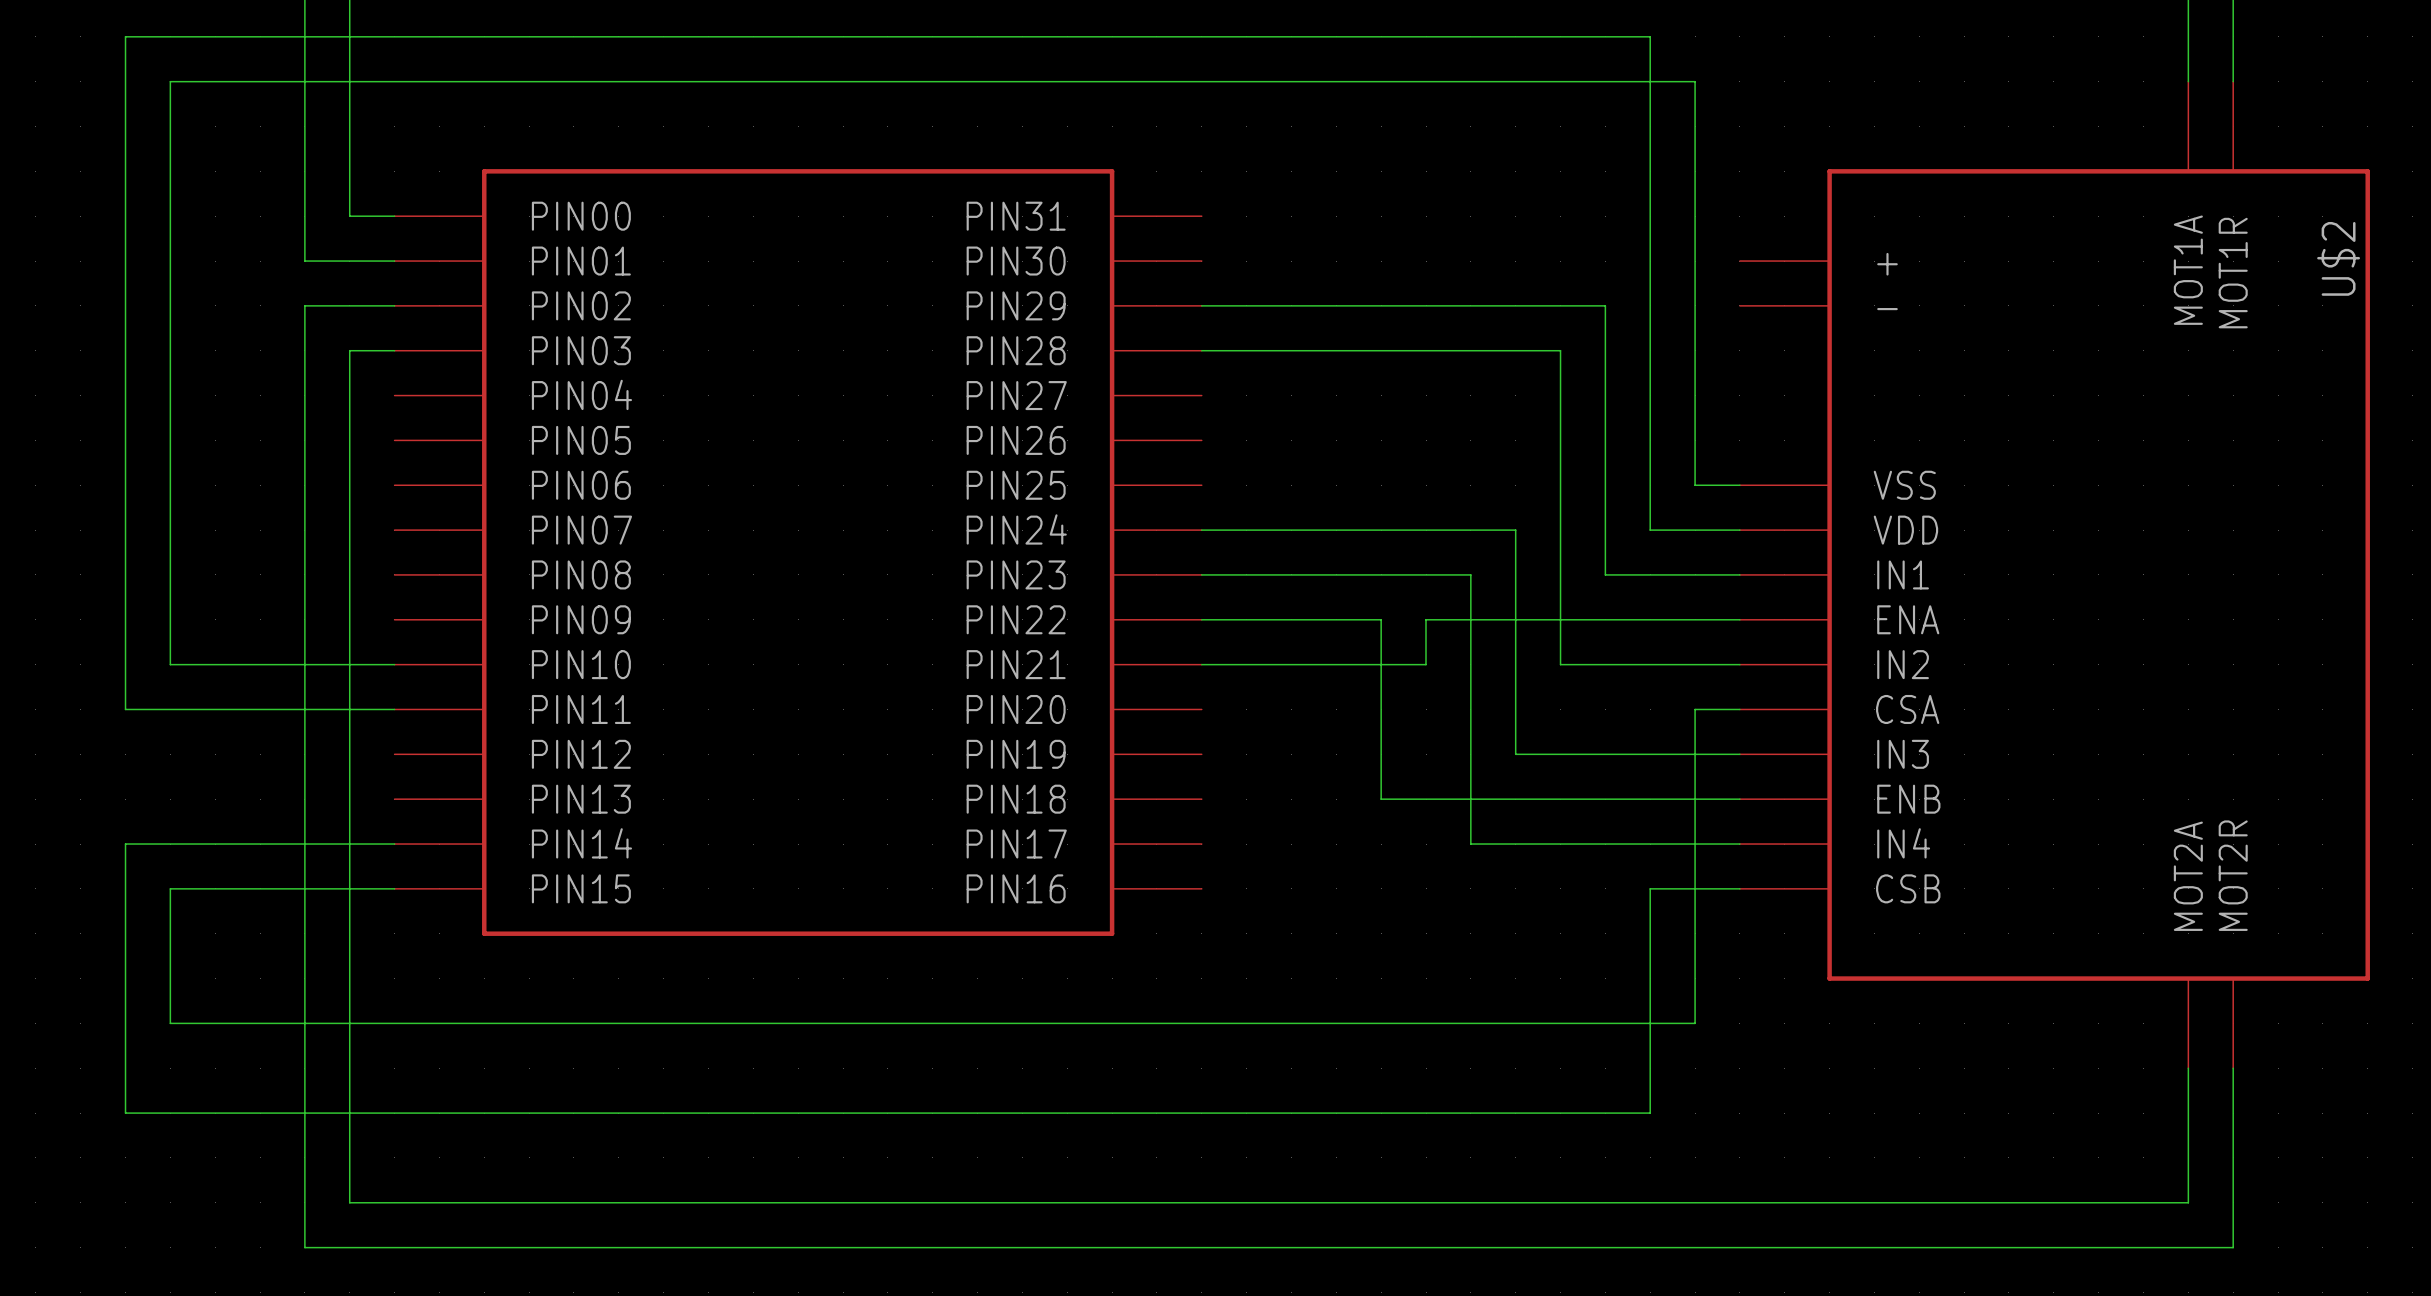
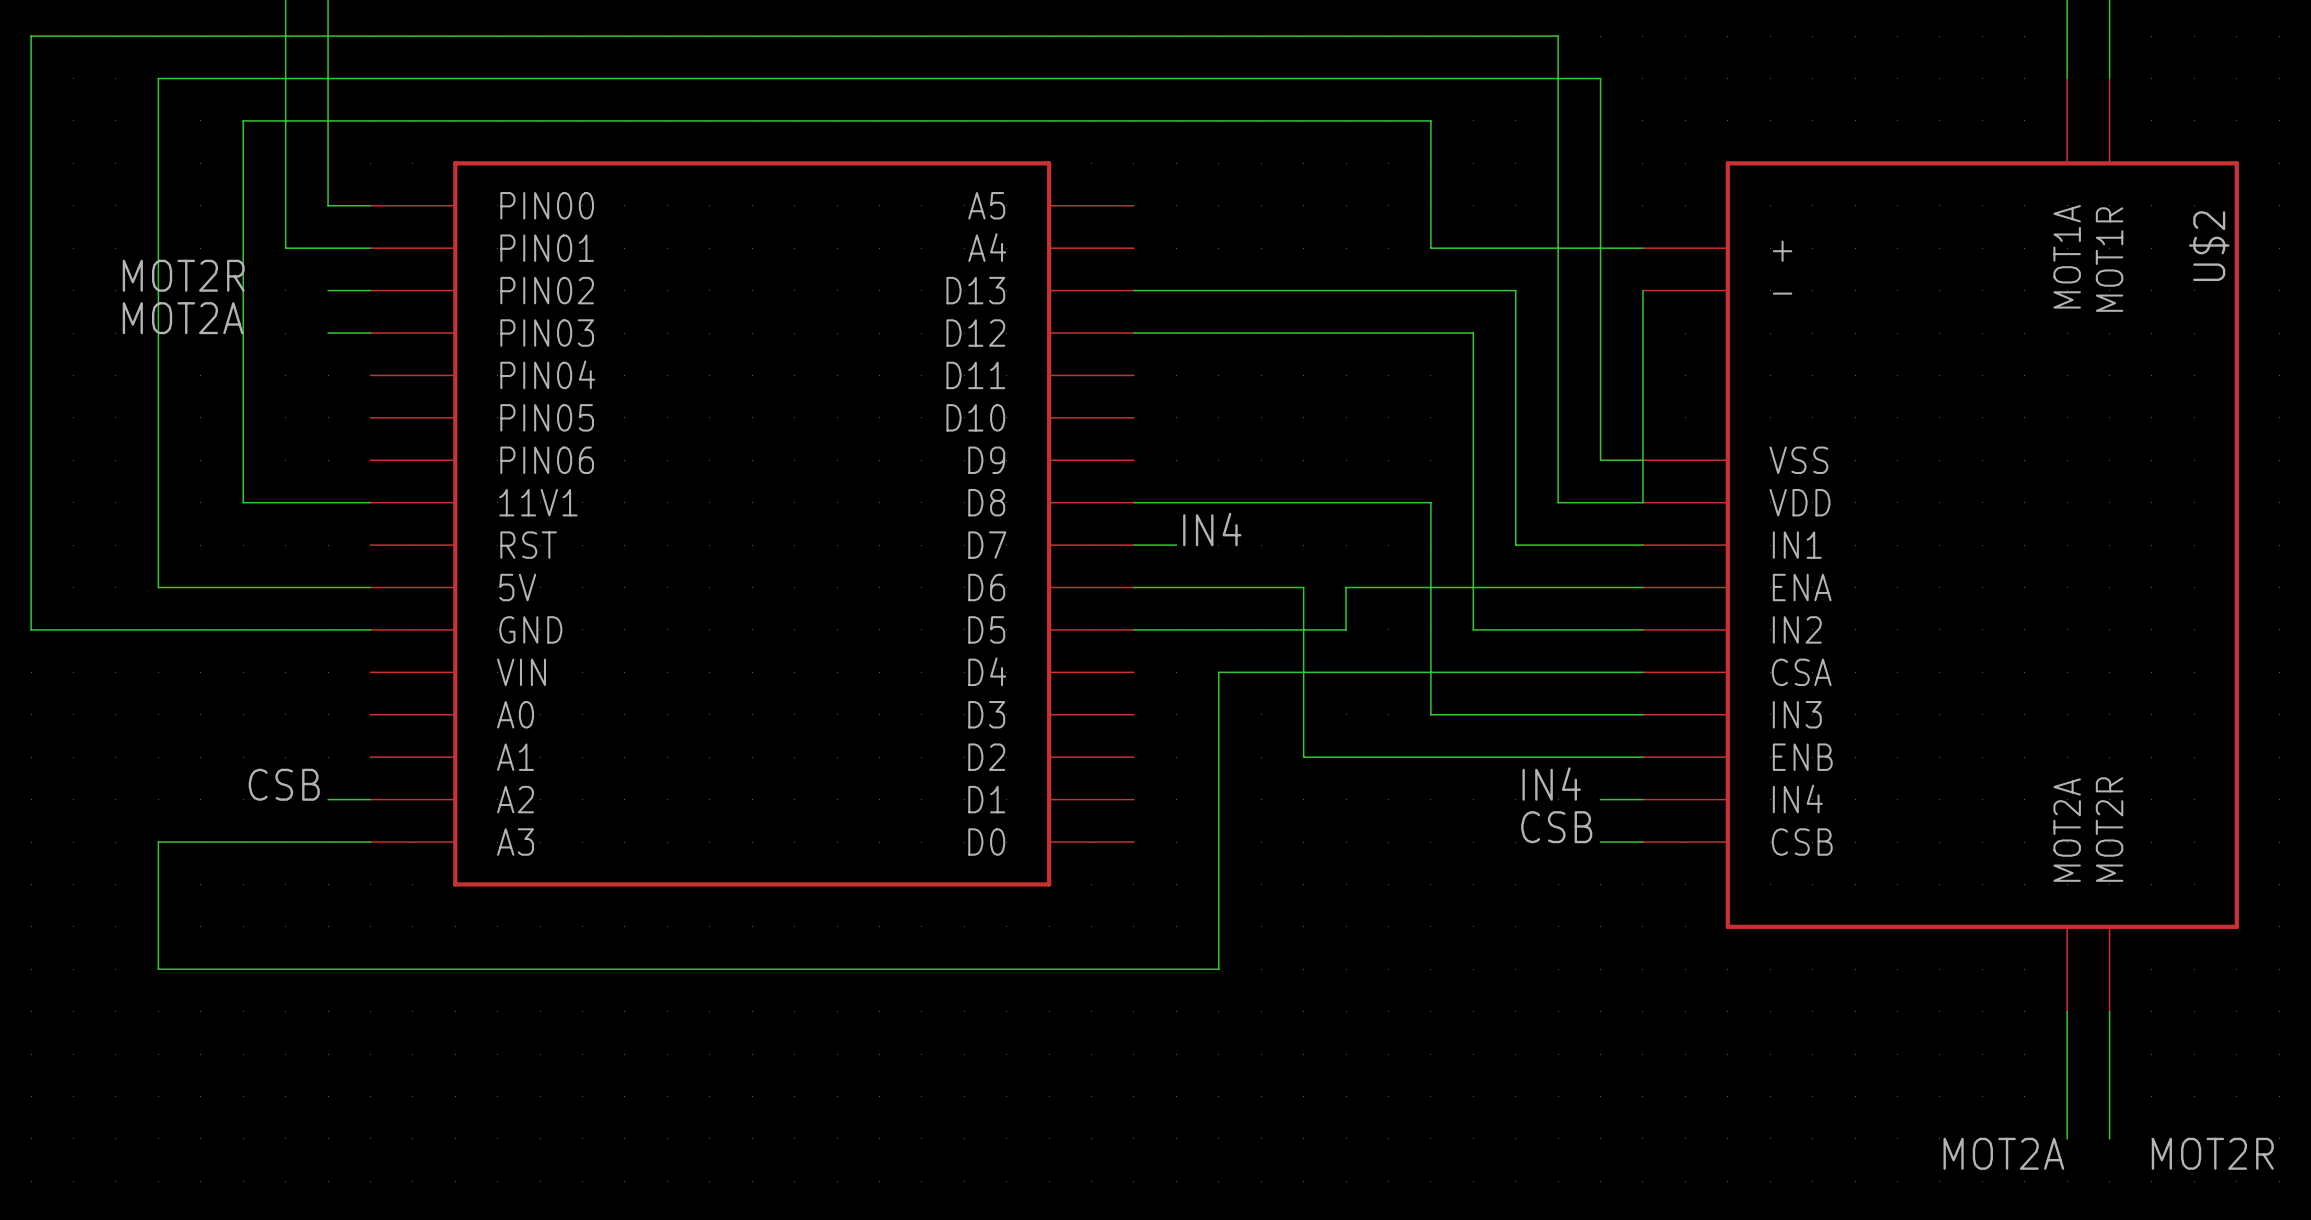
wire: (125, 36) (125, 709) (394, 709) -> (115, 36) (31, 36) (31, 629) (158, 629)
part symbol: [394, 169, 1202, 936] -> [370, 161, 1134, 887]
wire: none -> (1642, 248) (1430, 248) (1430, 120) (243, 120) (243, 502) (370, 502)
label: none -> MOT2R (183, 275)
wire: (349, 305) (304, 305) (304, 1247) (2233, 1247) (2233, 1202) -> none
wire: none -> (1642, 290) (1642, 502)
label: none -> MOT2A (183, 318)
wire: (349, 350) (349, 1202) (2188, 1202) -> none
label: none -> IN4 (1212, 529)
wire: (1246, 574) (1470, 574) (1470, 844) (1695, 844) -> none
wire: (170, 619) (170, 664) -> (158, 587) (370, 587)
wire: (1695, 709) (1695, 1023) (1291, 1023) -> (1600, 672) (1218, 672) (1218, 969)
label: none -> IN4 (1551, 784)
label: none -> CSB (284, 784)
wire: (349, 844) (125, 844) (125, 1113) (1650, 1113) (1650, 888) (1695, 888) -> none
label: none -> CSB (1556, 827)
label: none -> MOT2A (2003, 1153)
label: none -> MOT2R (2212, 1153)

